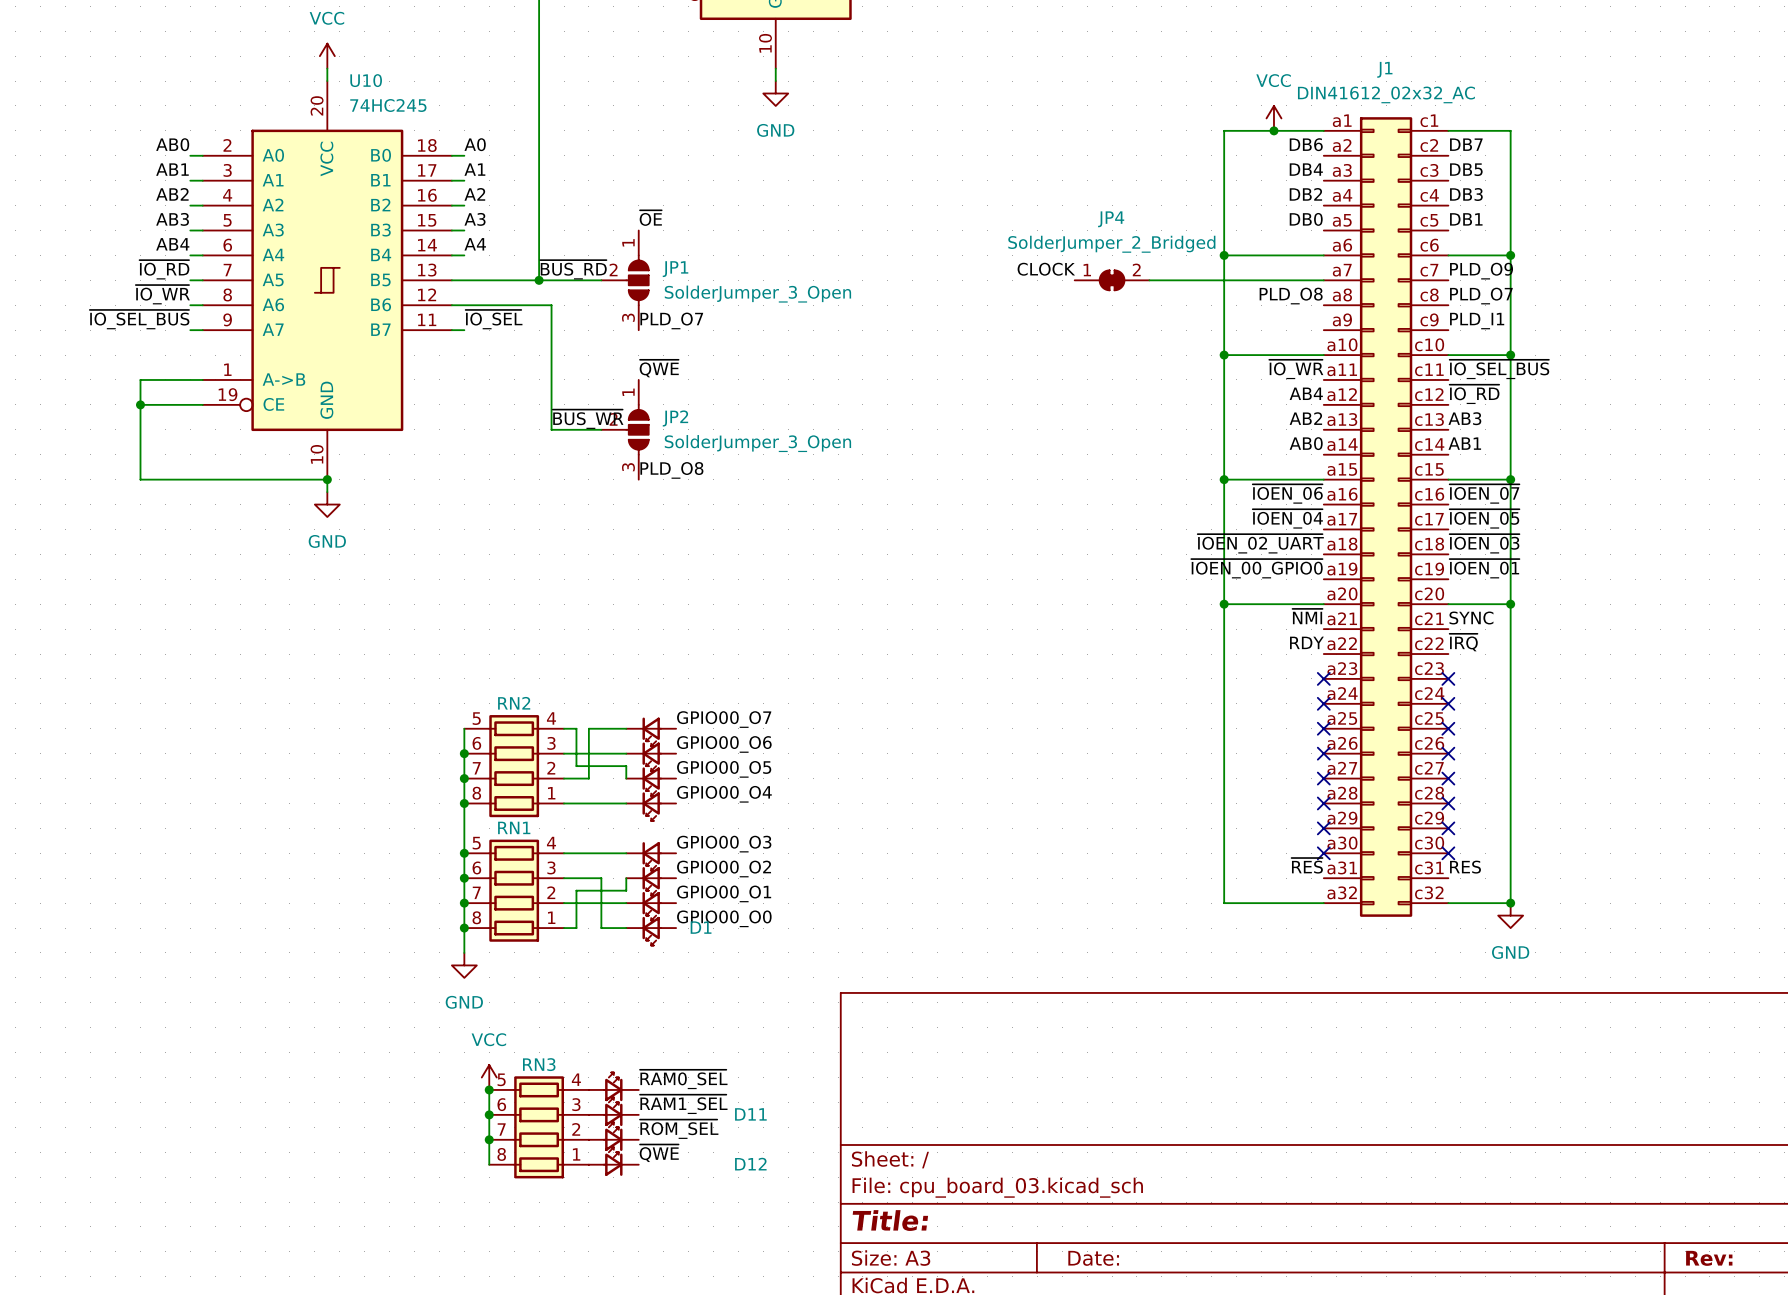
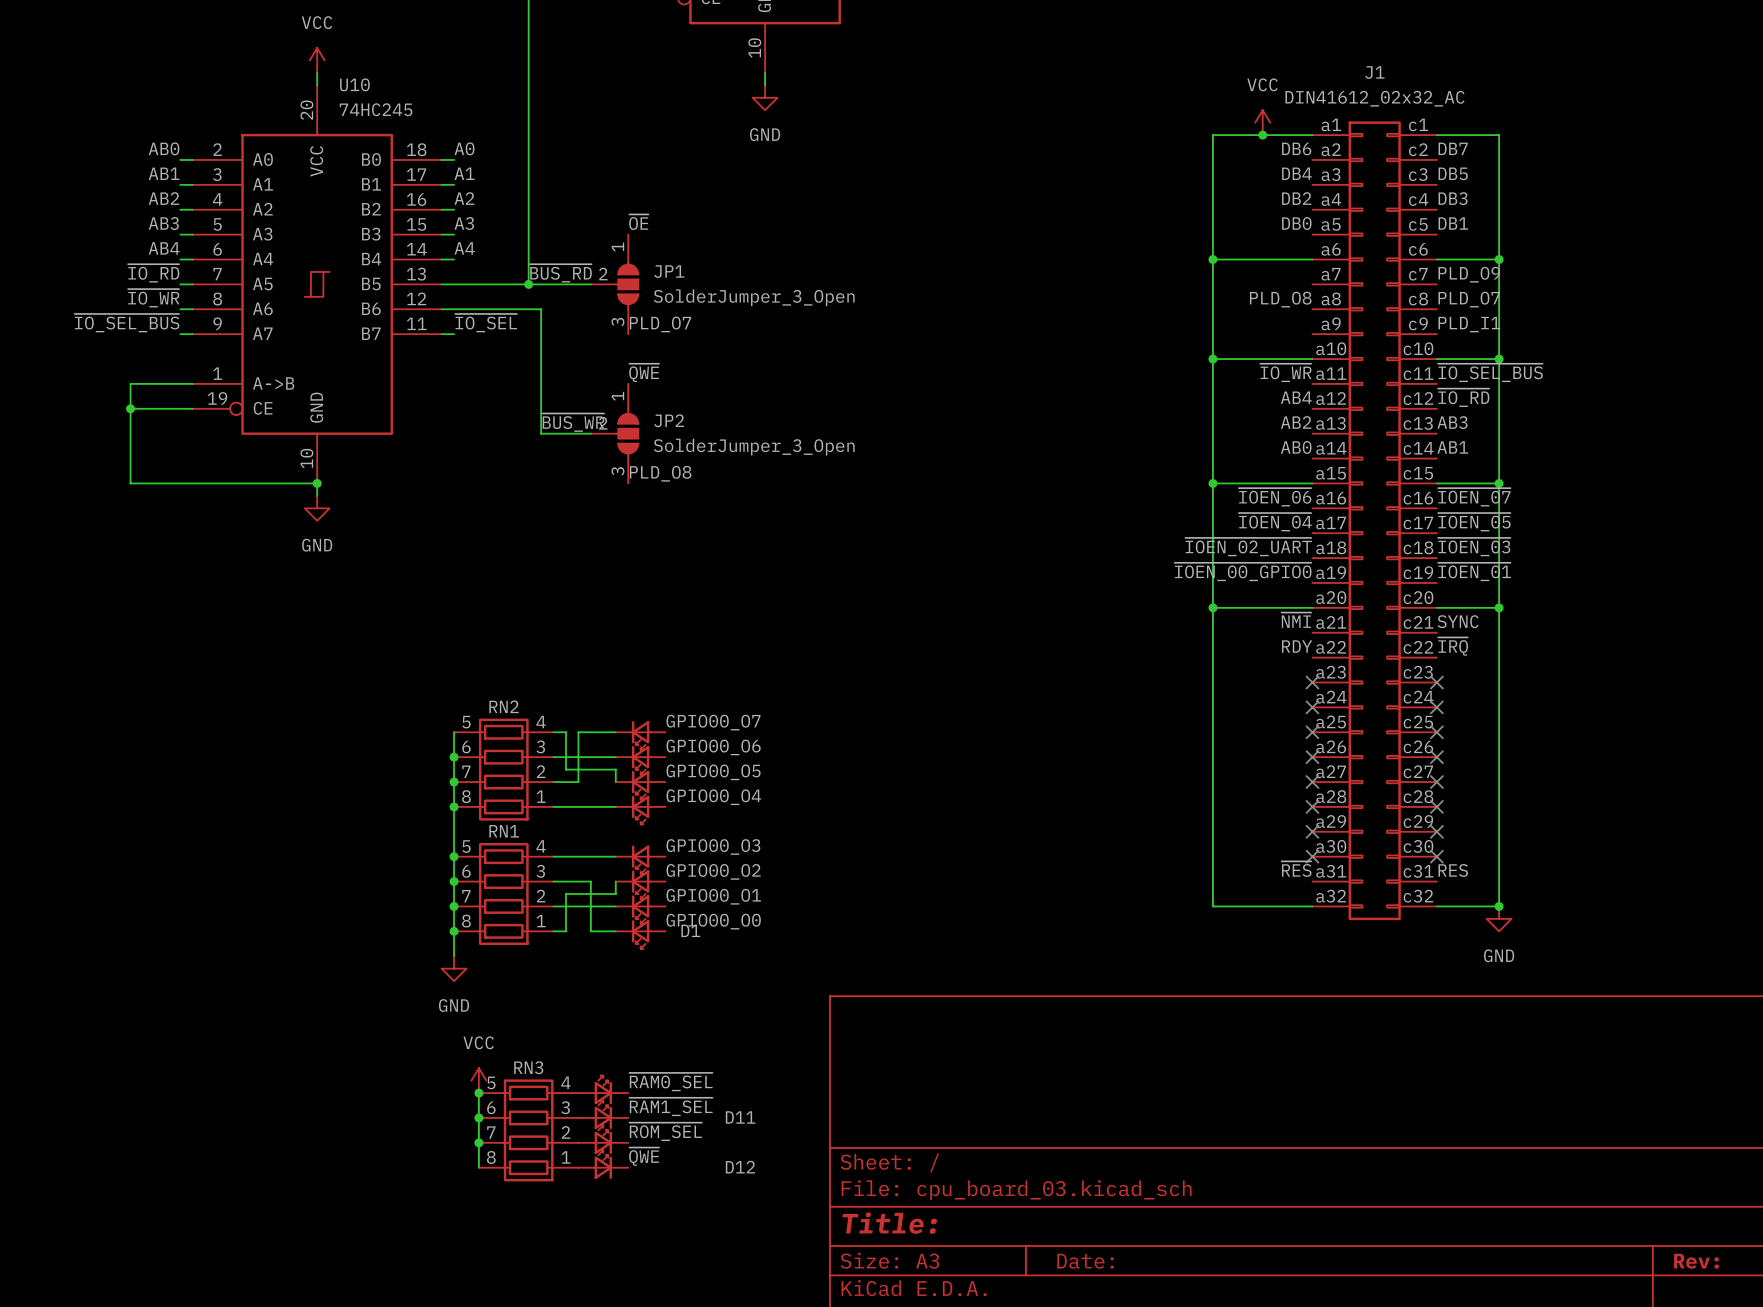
label: CLOCK (1046, 269) -> none
JP4: SolderJumper_2_Bridged (1112, 280) -> none
wire: (1149, 280) (1323, 280) -> none

